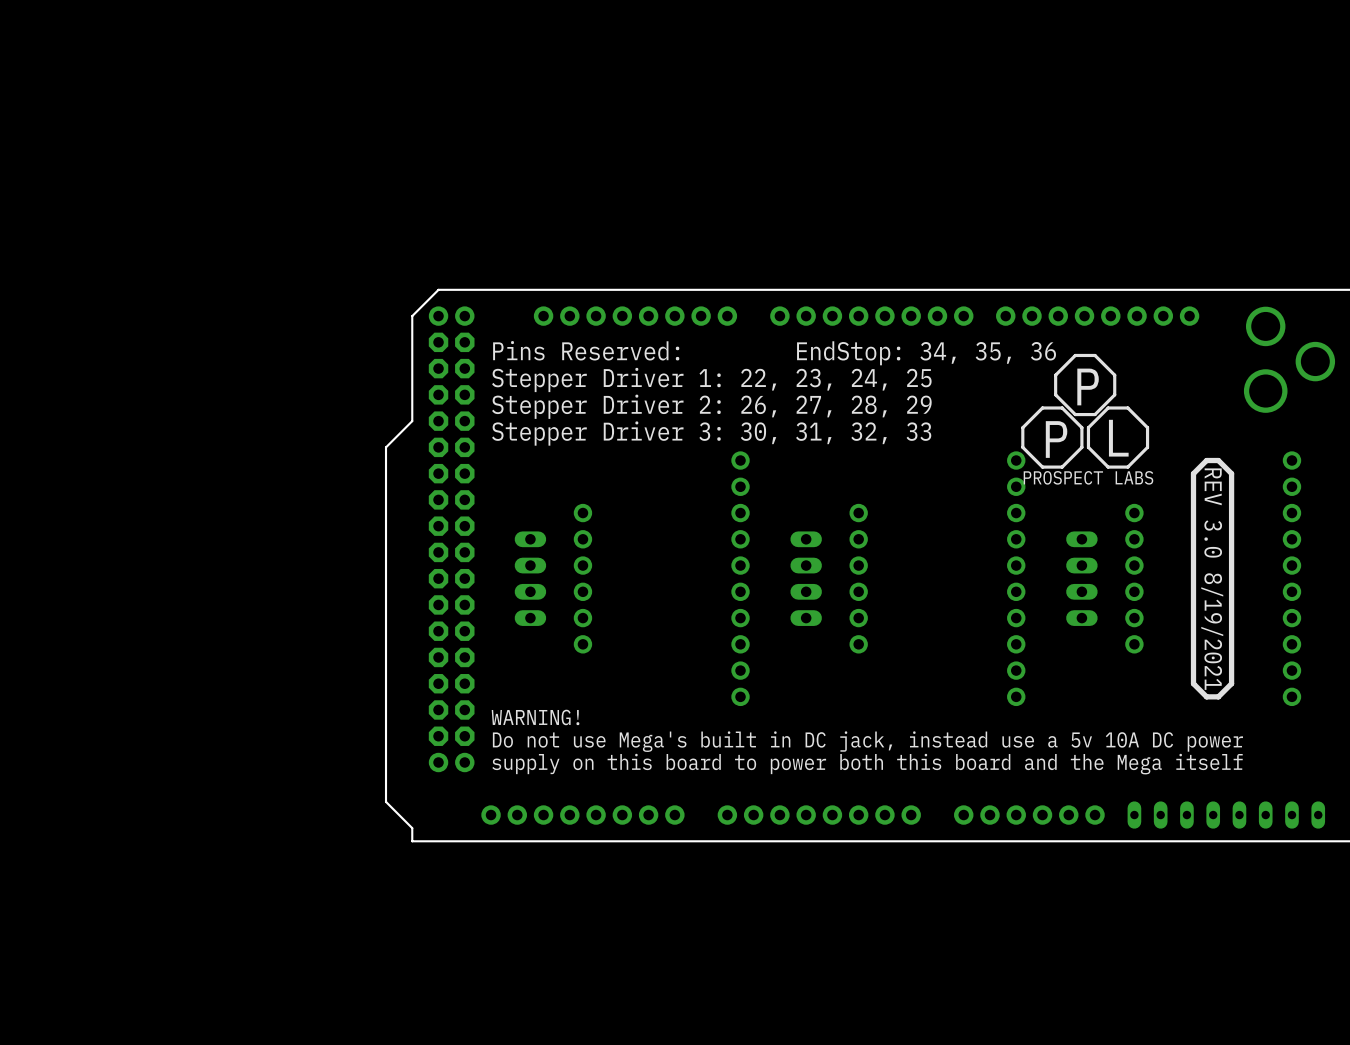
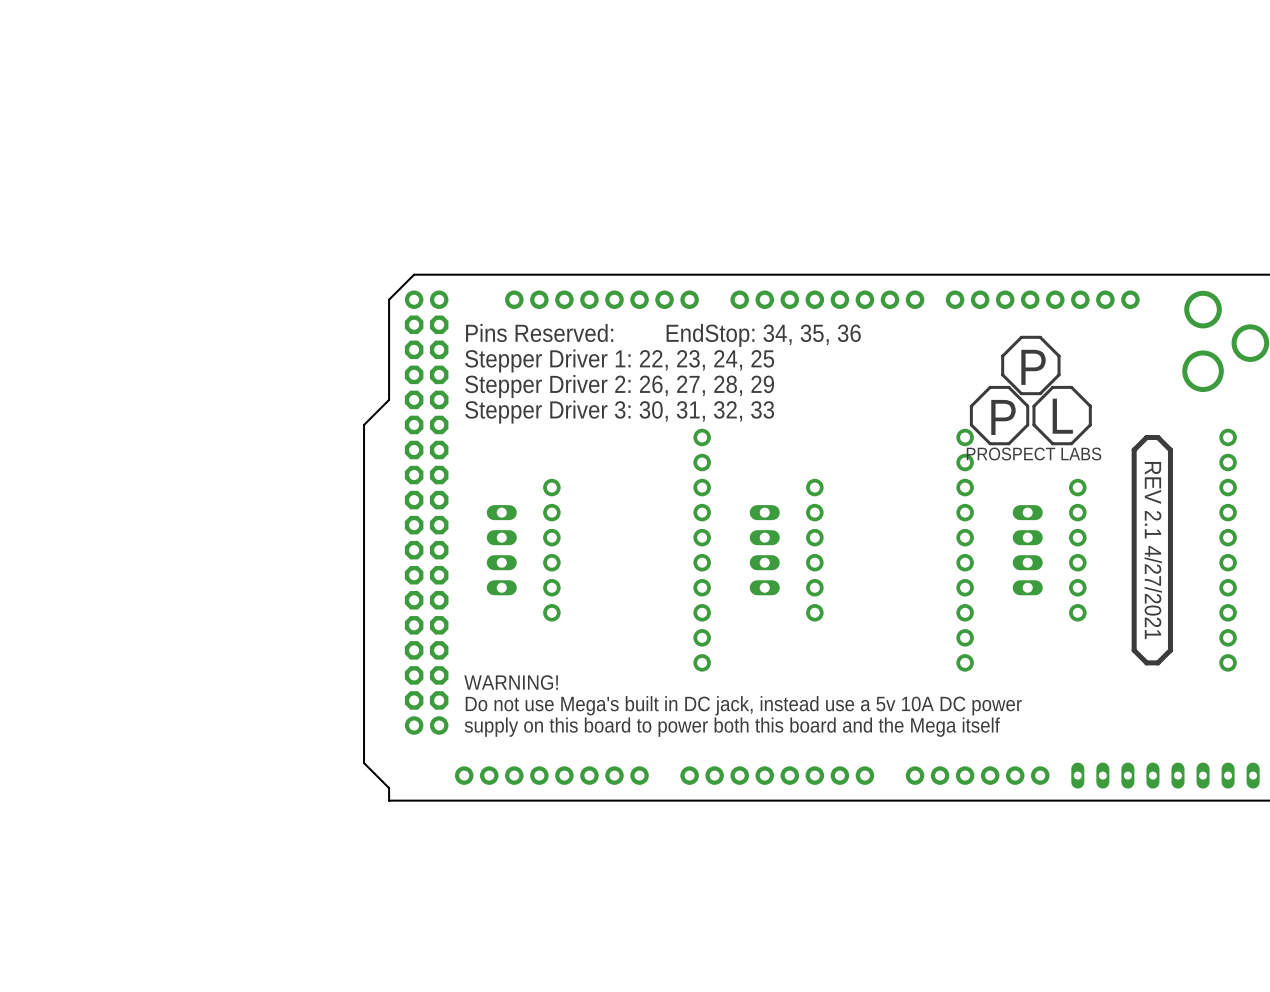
text: REV 3.0 8/19/2021 (1212, 579) -> REV 2.1 4/27/2021 (1153, 550)

